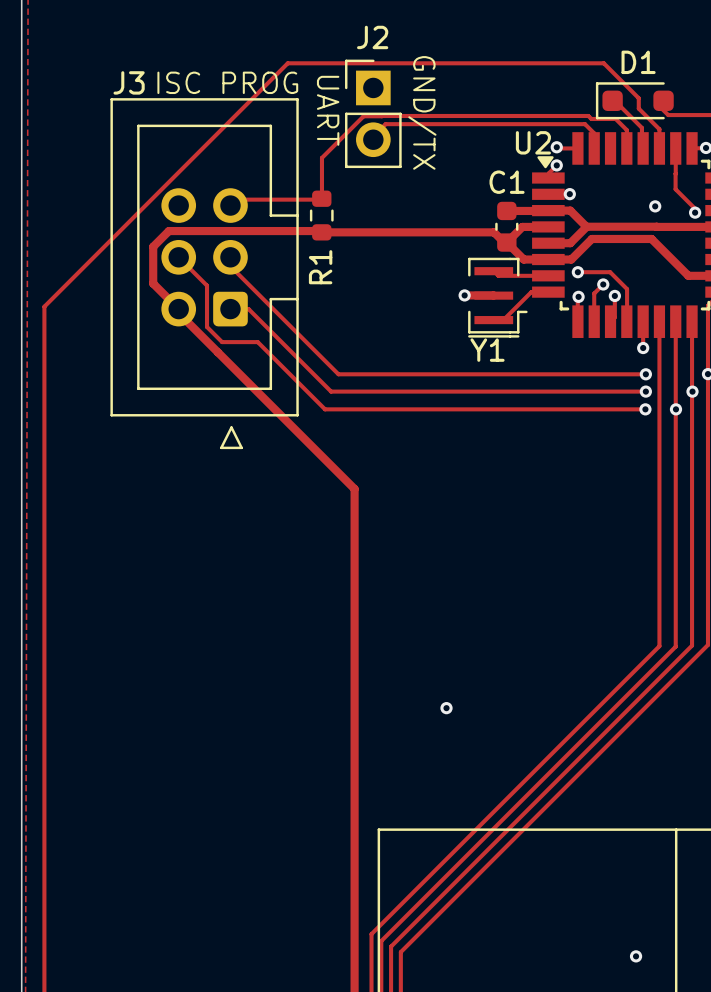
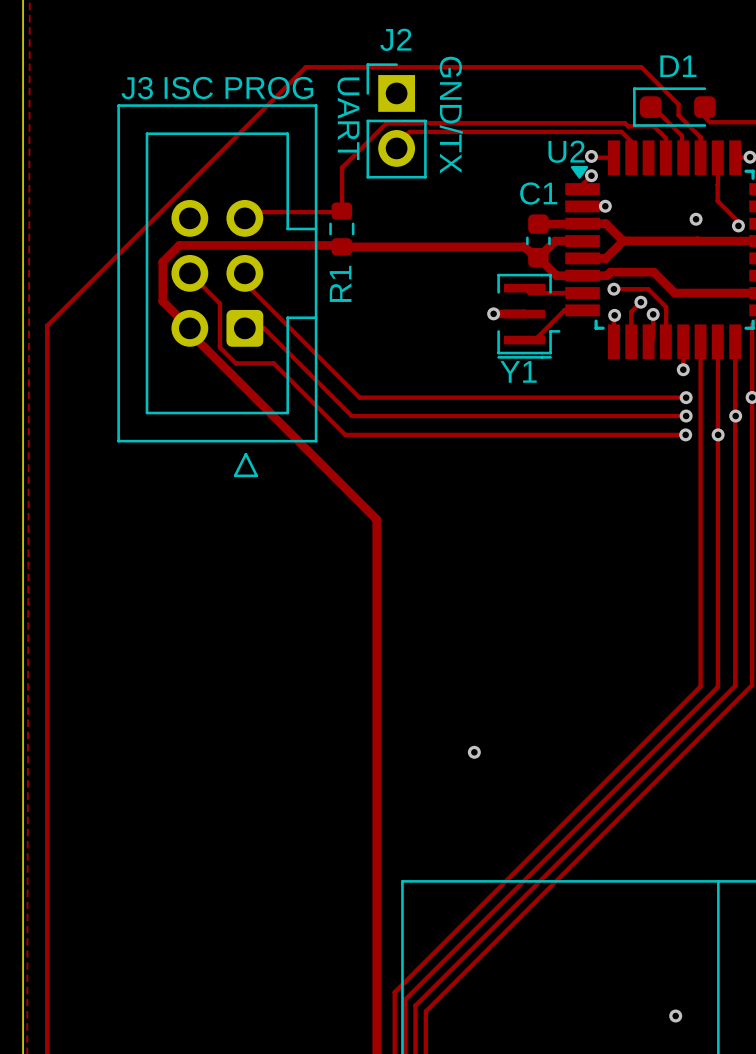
track: (574, 256) (591, 238) (651, 238) (688, 275) -> (610, 272) (653, 272) (674, 293) (731, 293)

